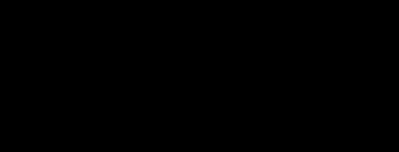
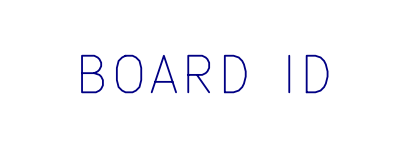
text: none -> BOARD ID (204, 74)

